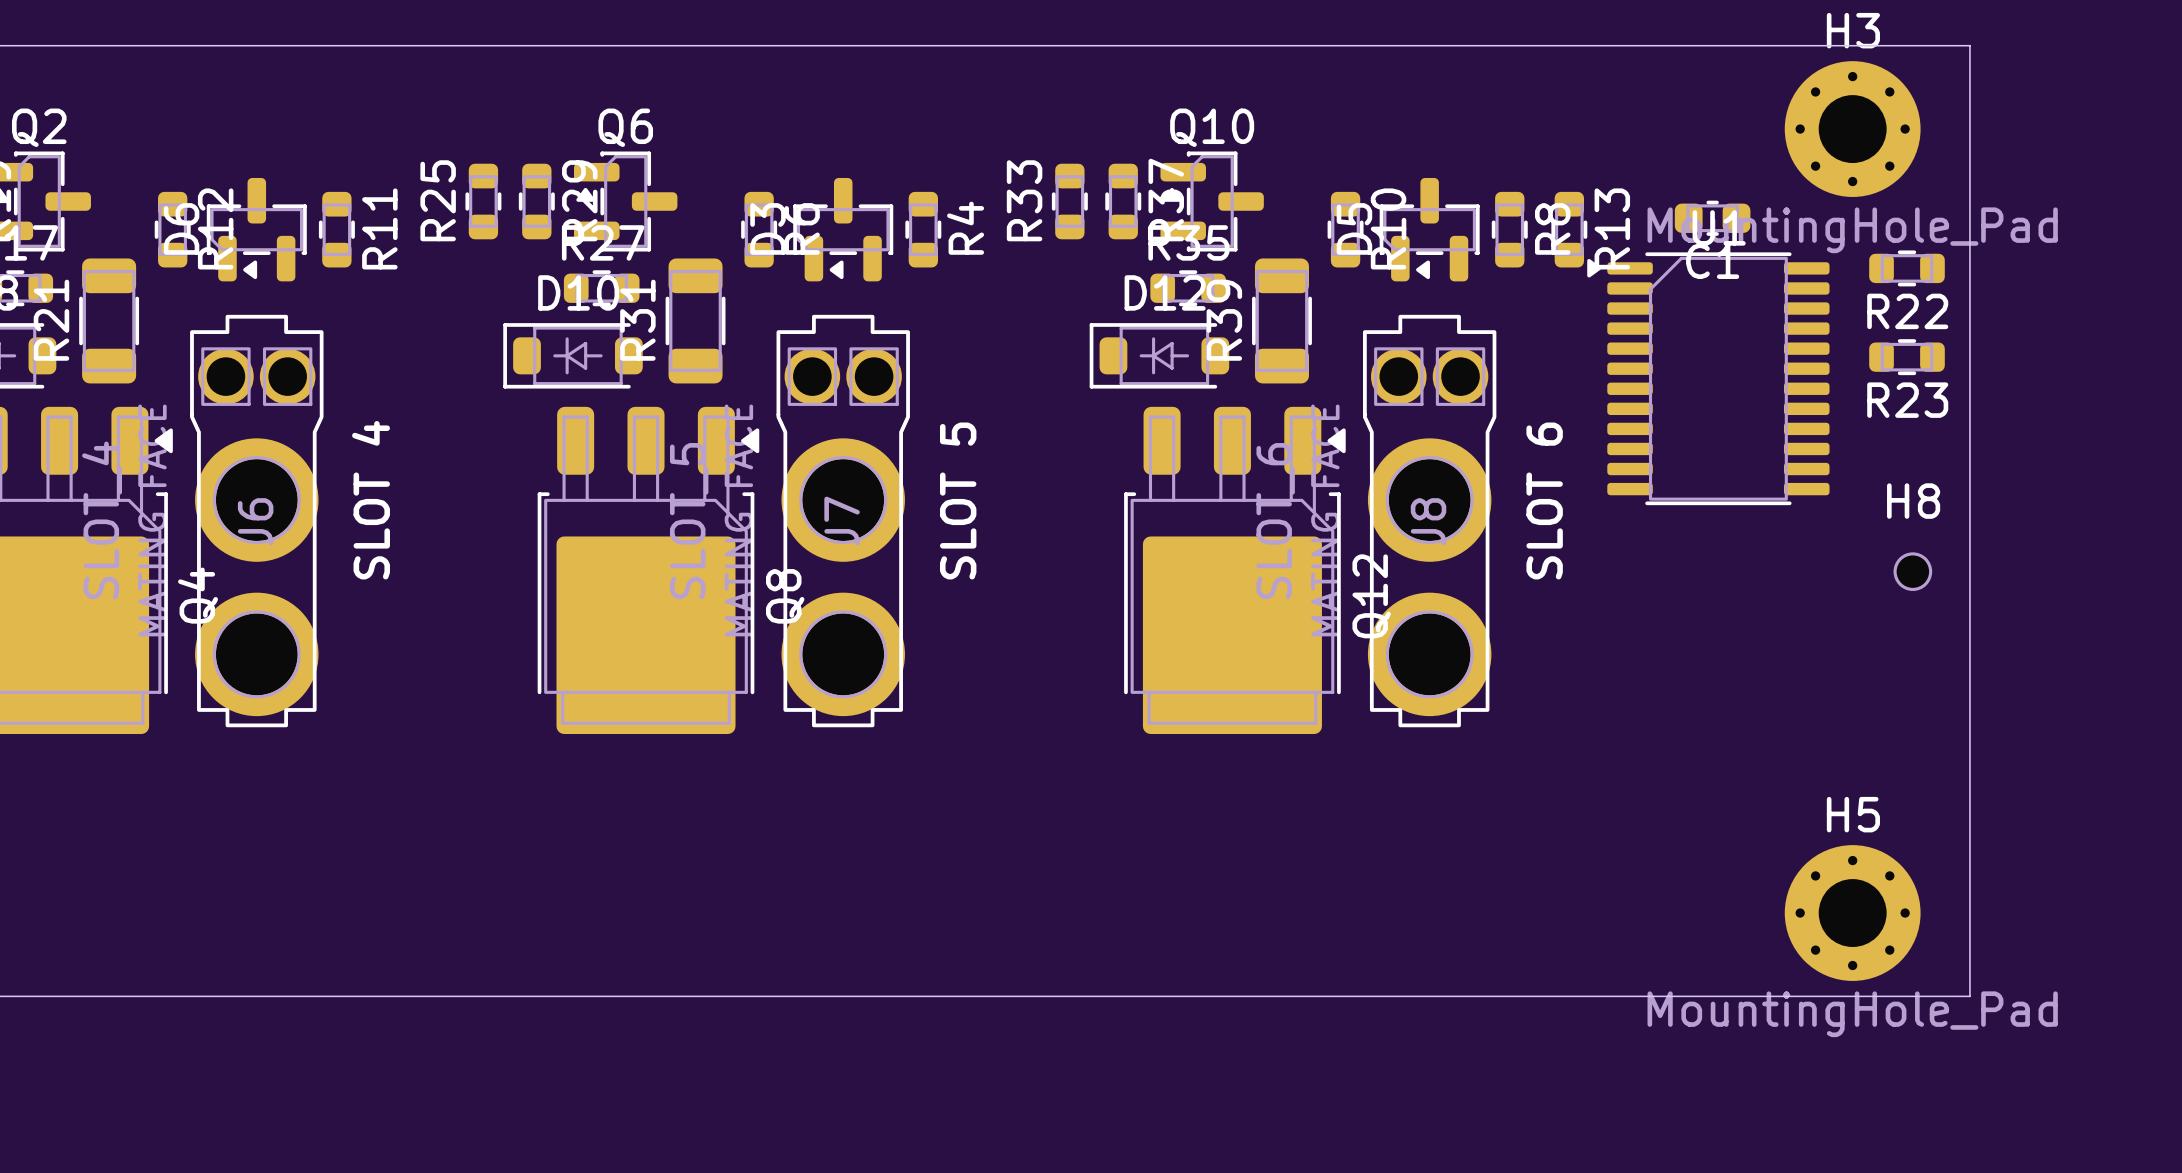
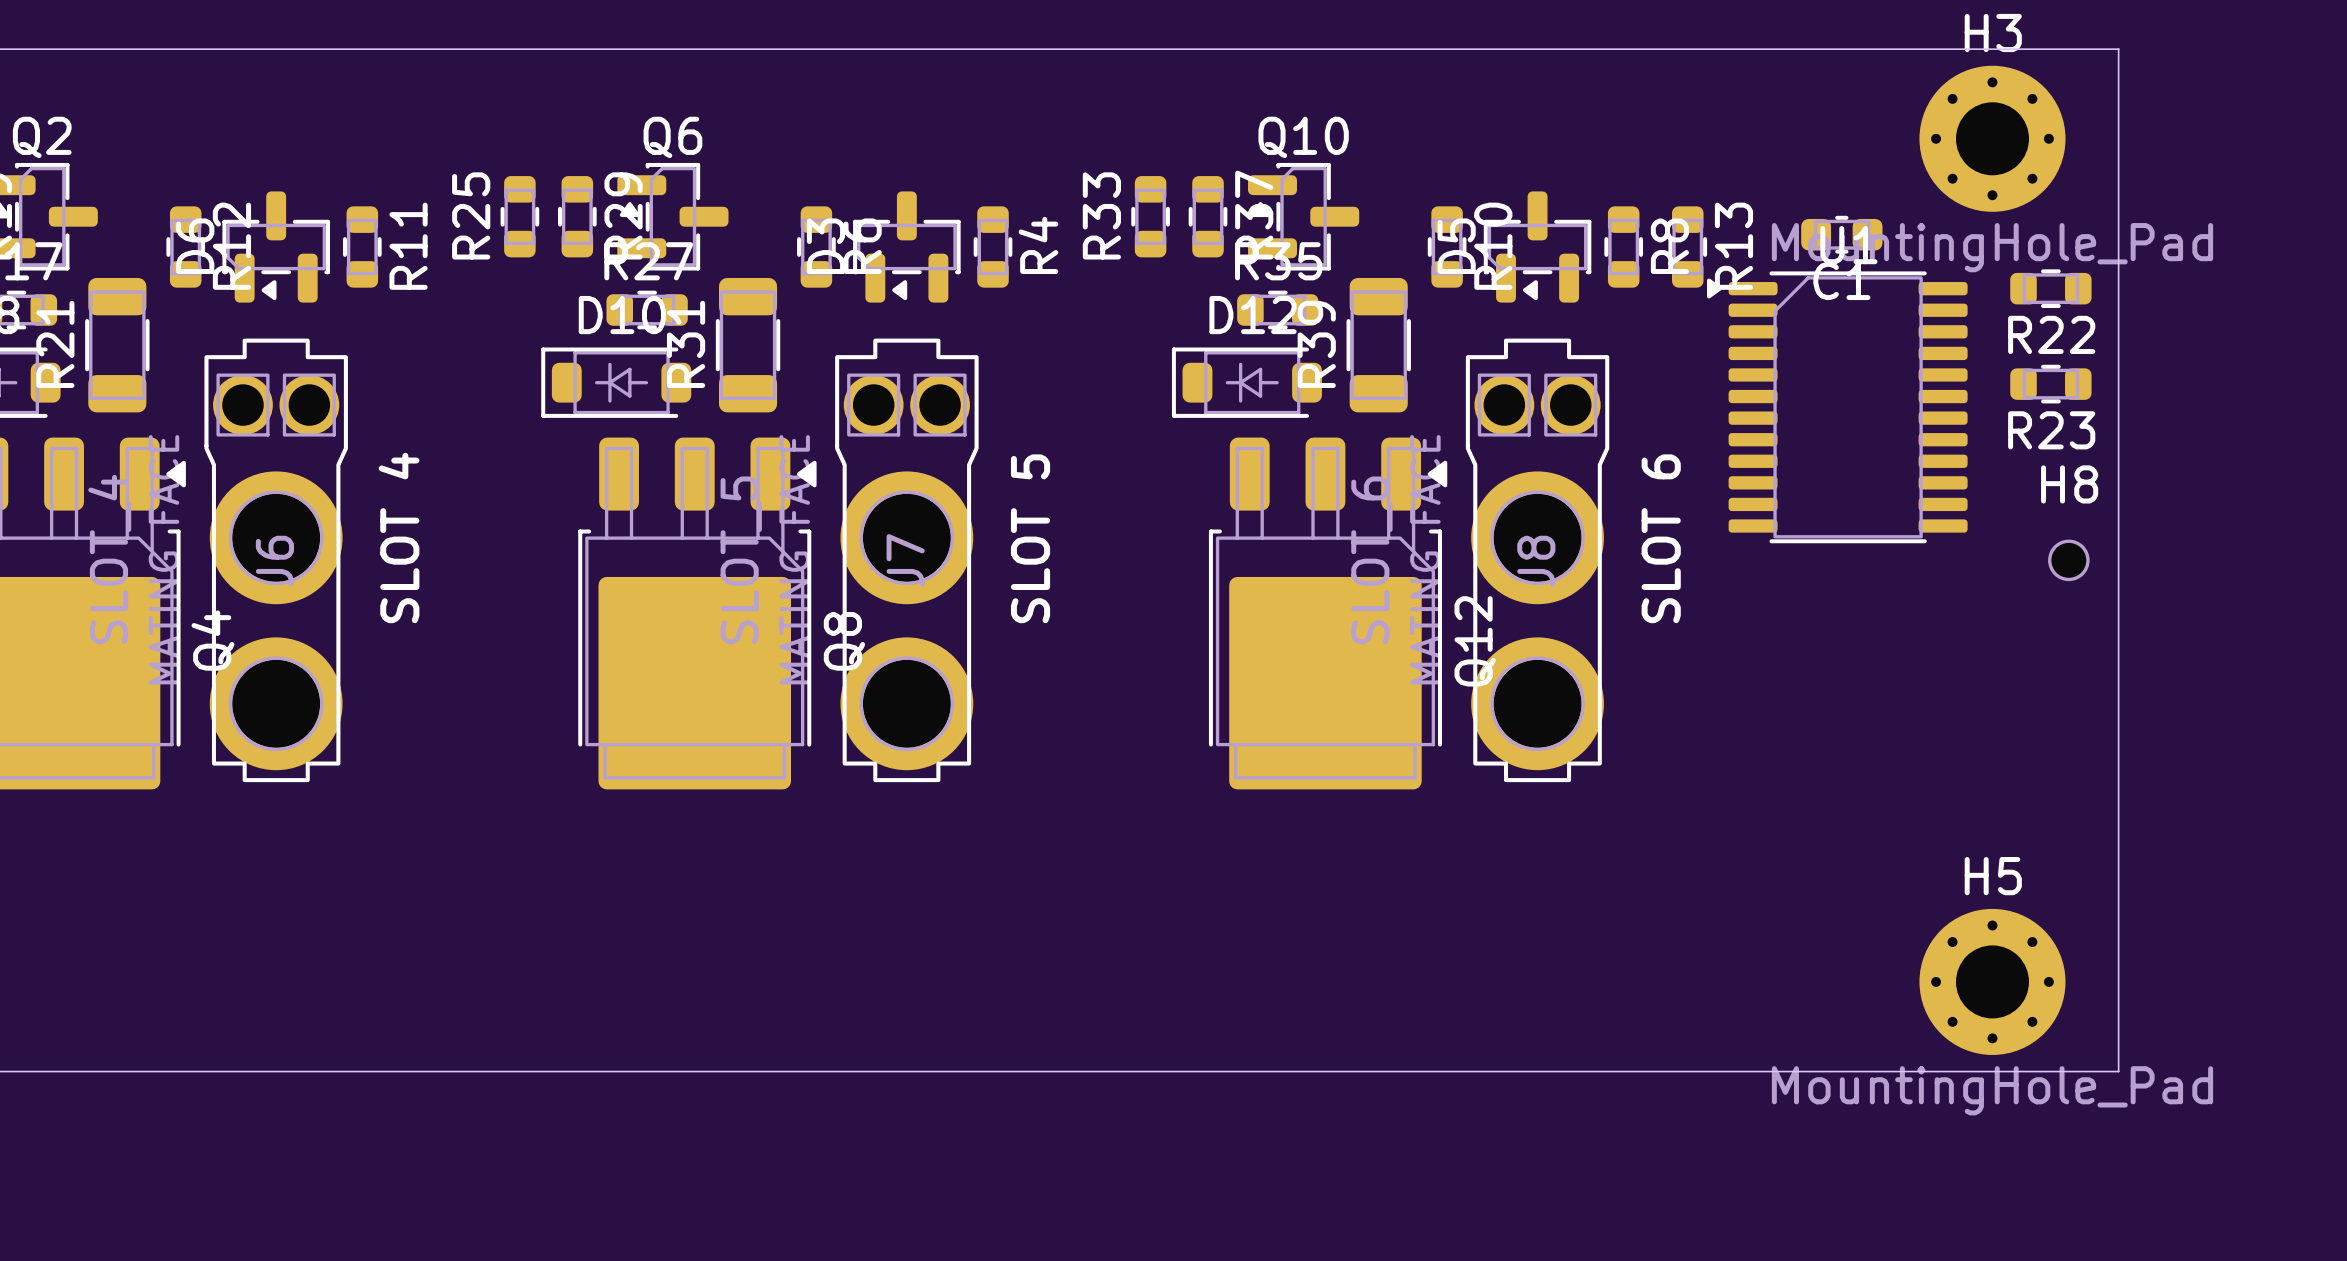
H8 position: (1912, 571) -> (2068, 560)

